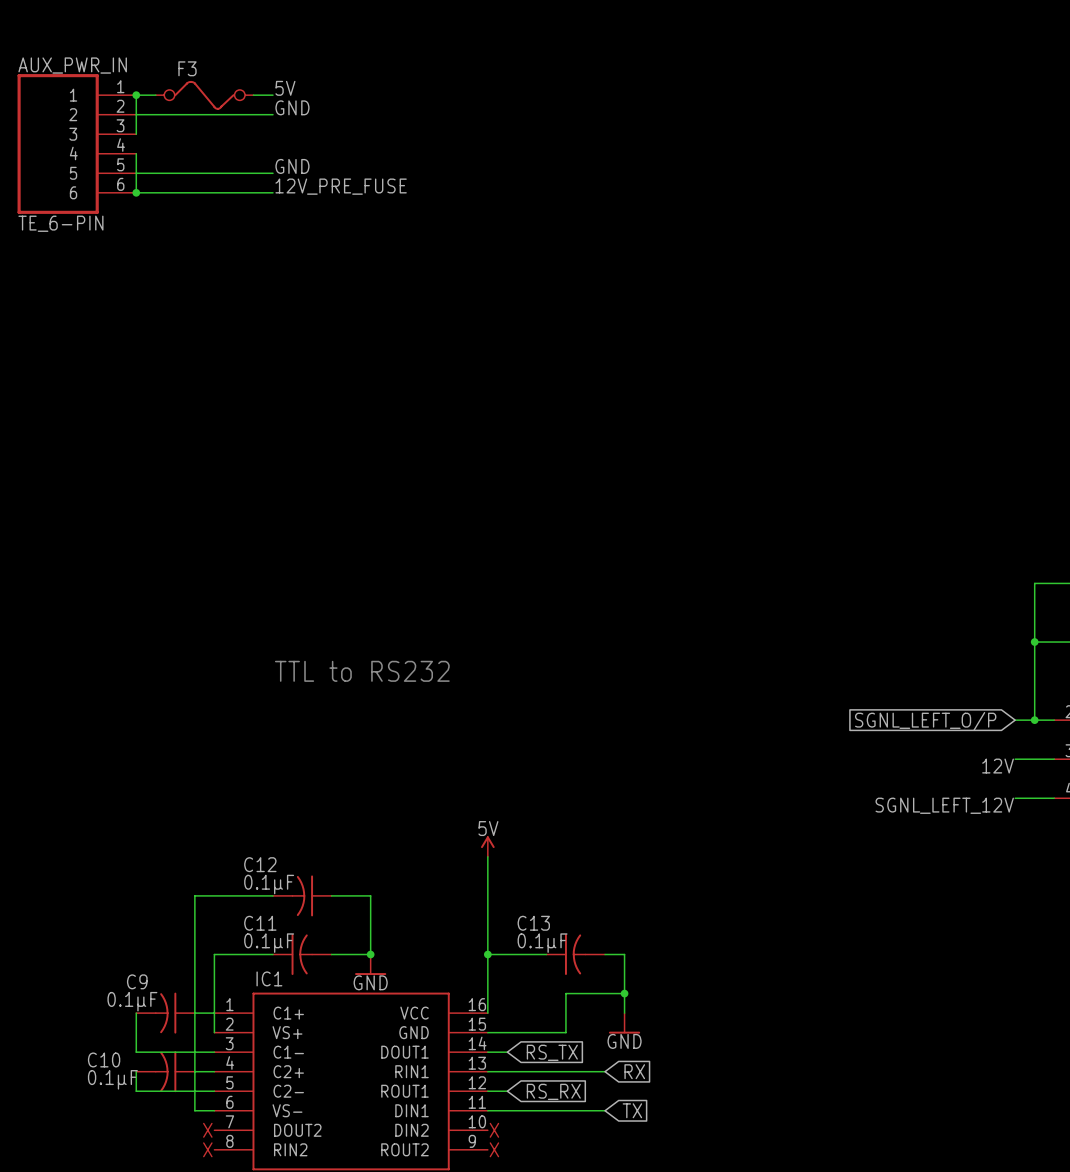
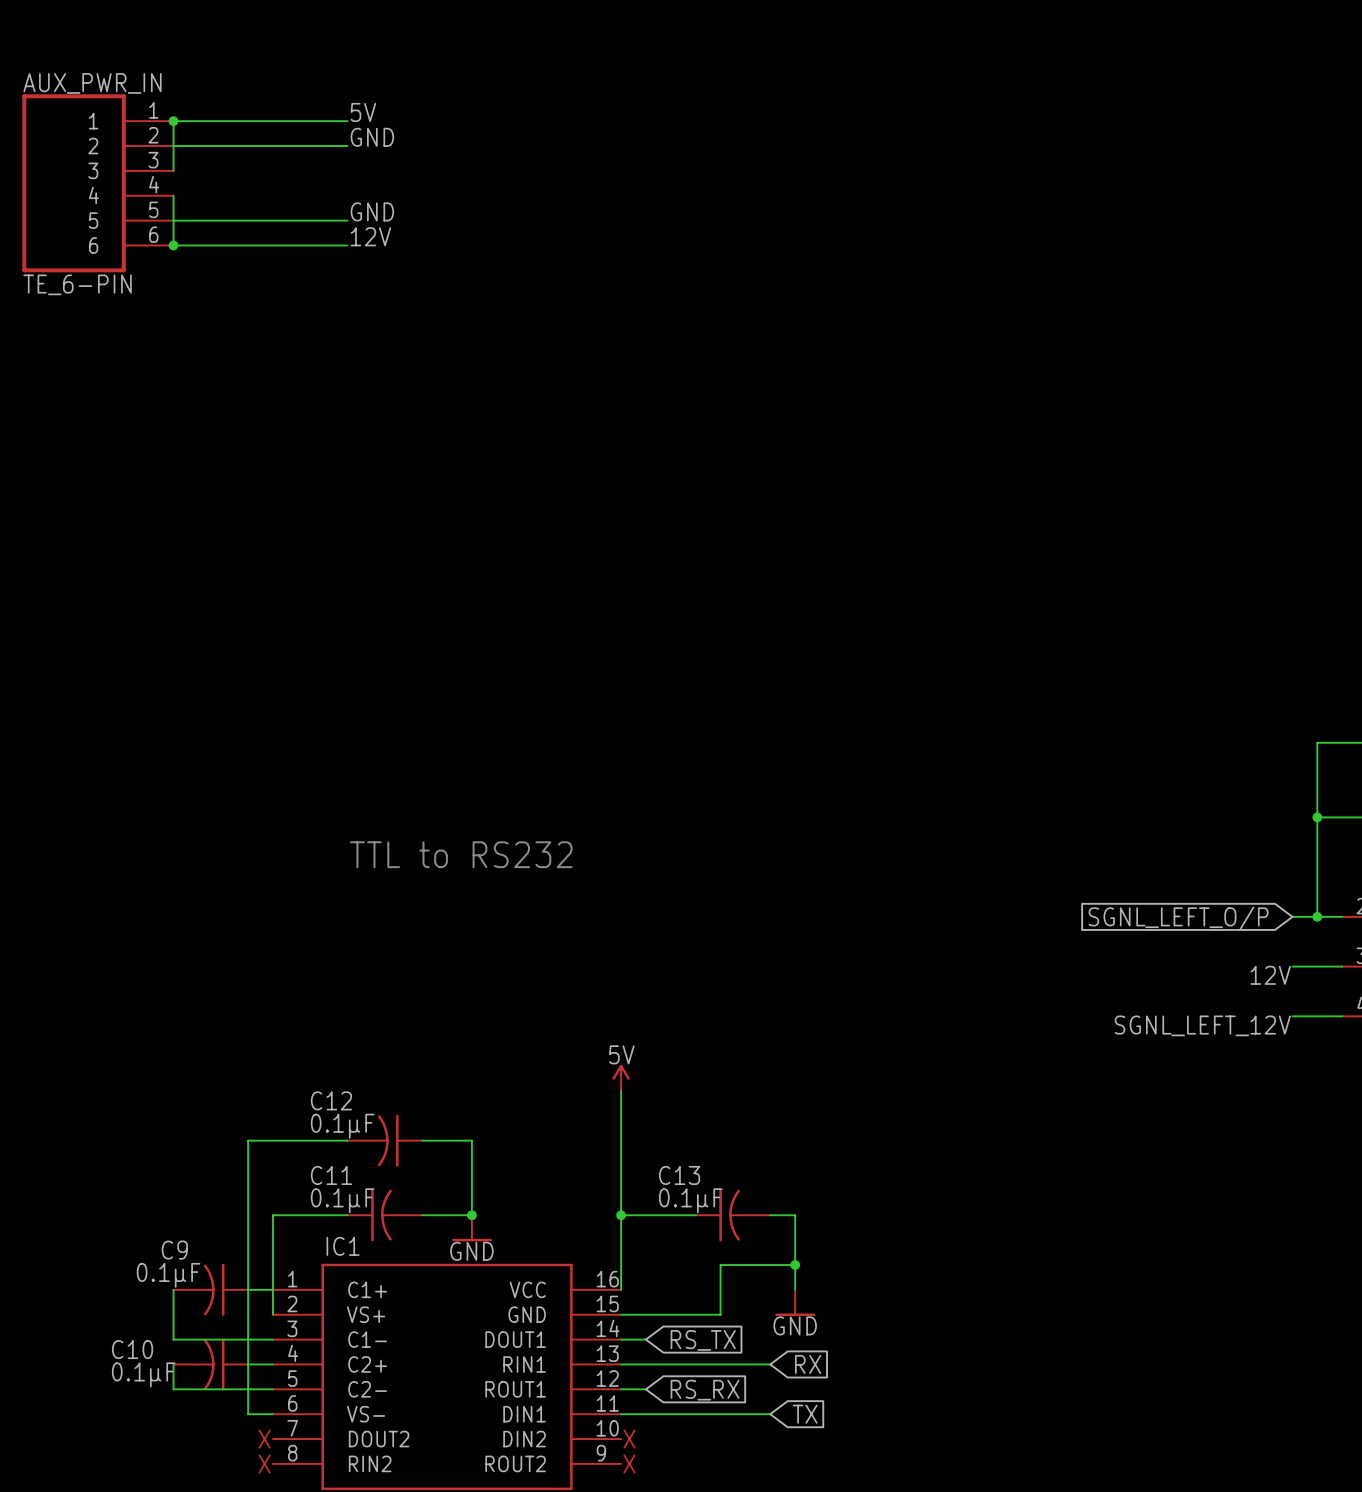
wire: none -> (198, 121) (322, 121)
F3: (204, 95) -> none
label: 12V_PRE_FUSE (341, 186) -> 12V (370, 236)

